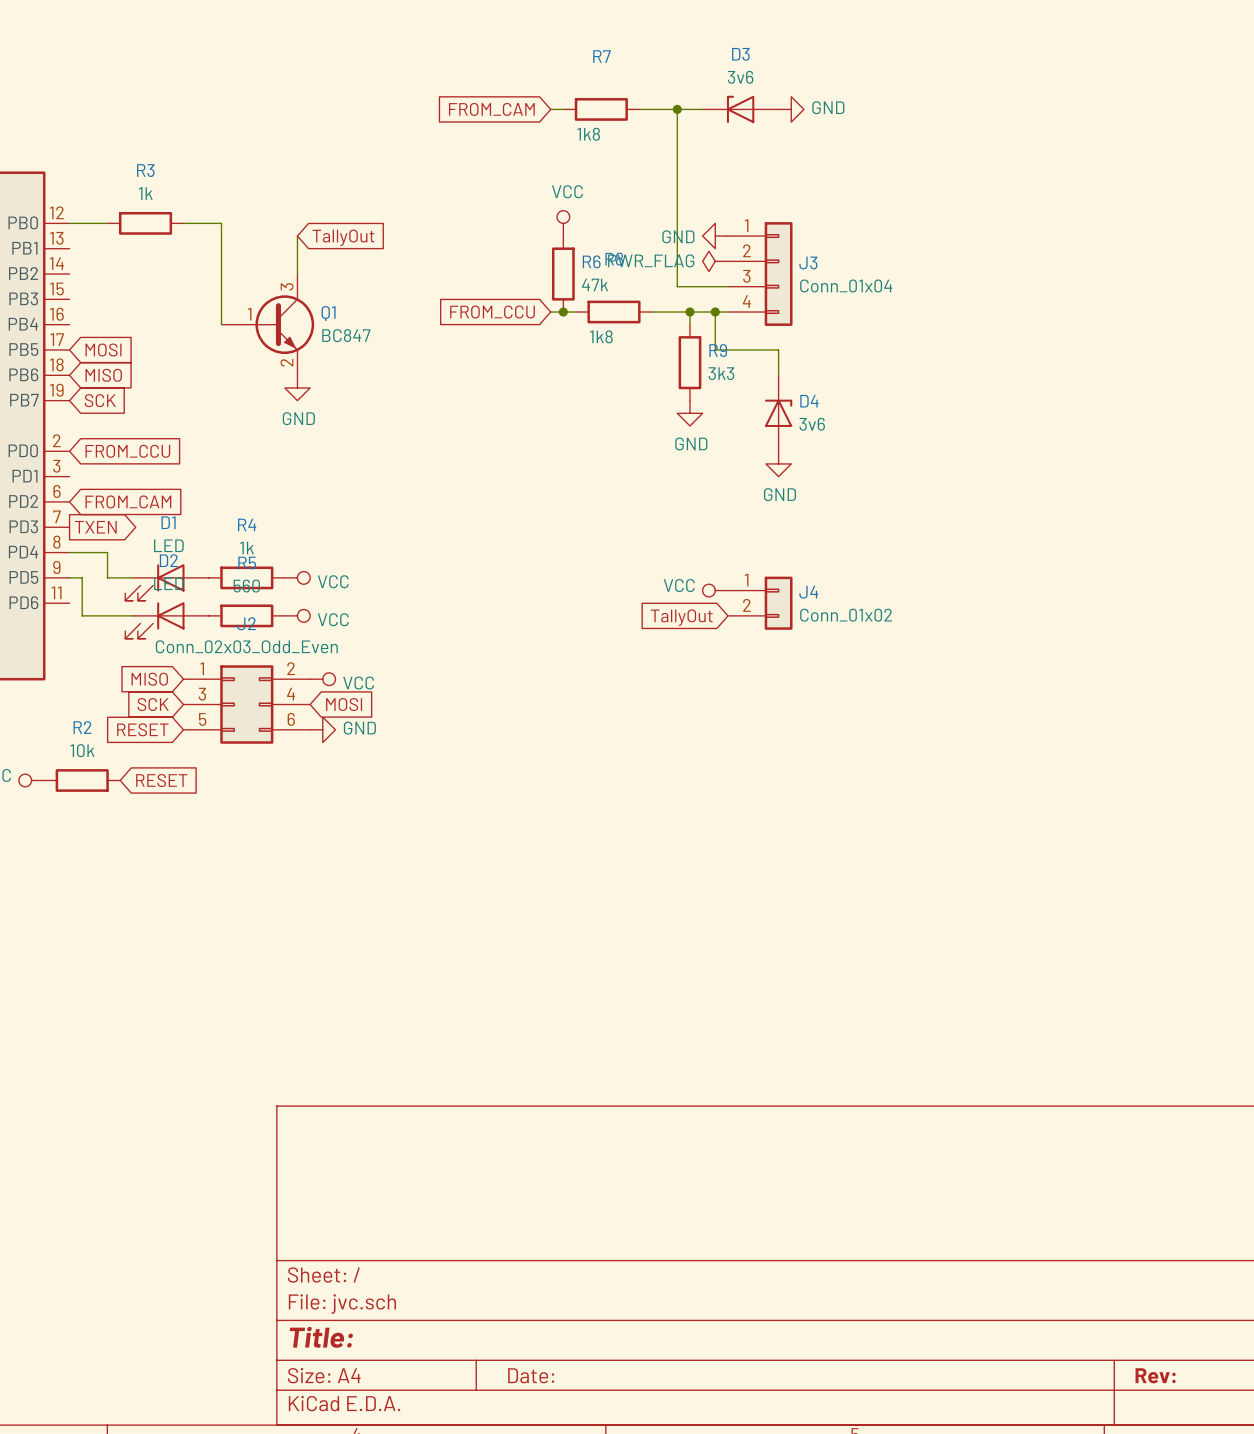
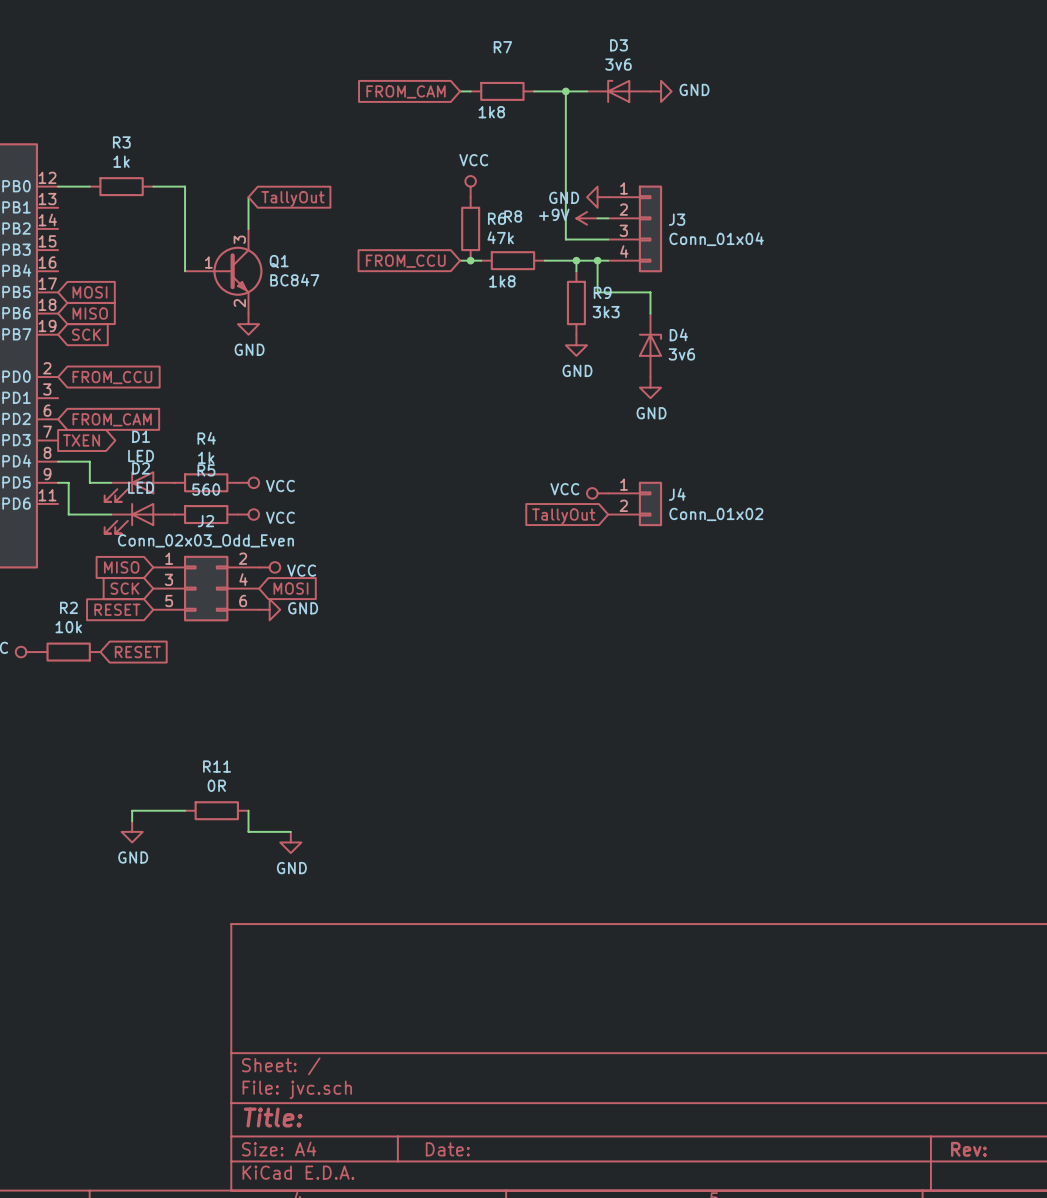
power symbol: none -> +9V (587, 218)
power symbol: PWR_FLAG (715, 261) -> none
wire: none -> (185, 810) (132, 810) (132, 821)
R11: none -> 0R (216, 810)
wire: none -> (248, 810) (248, 831) (290, 831)
power symbol: none -> GND (132, 831)
power symbol: none -> GND (290, 842)

